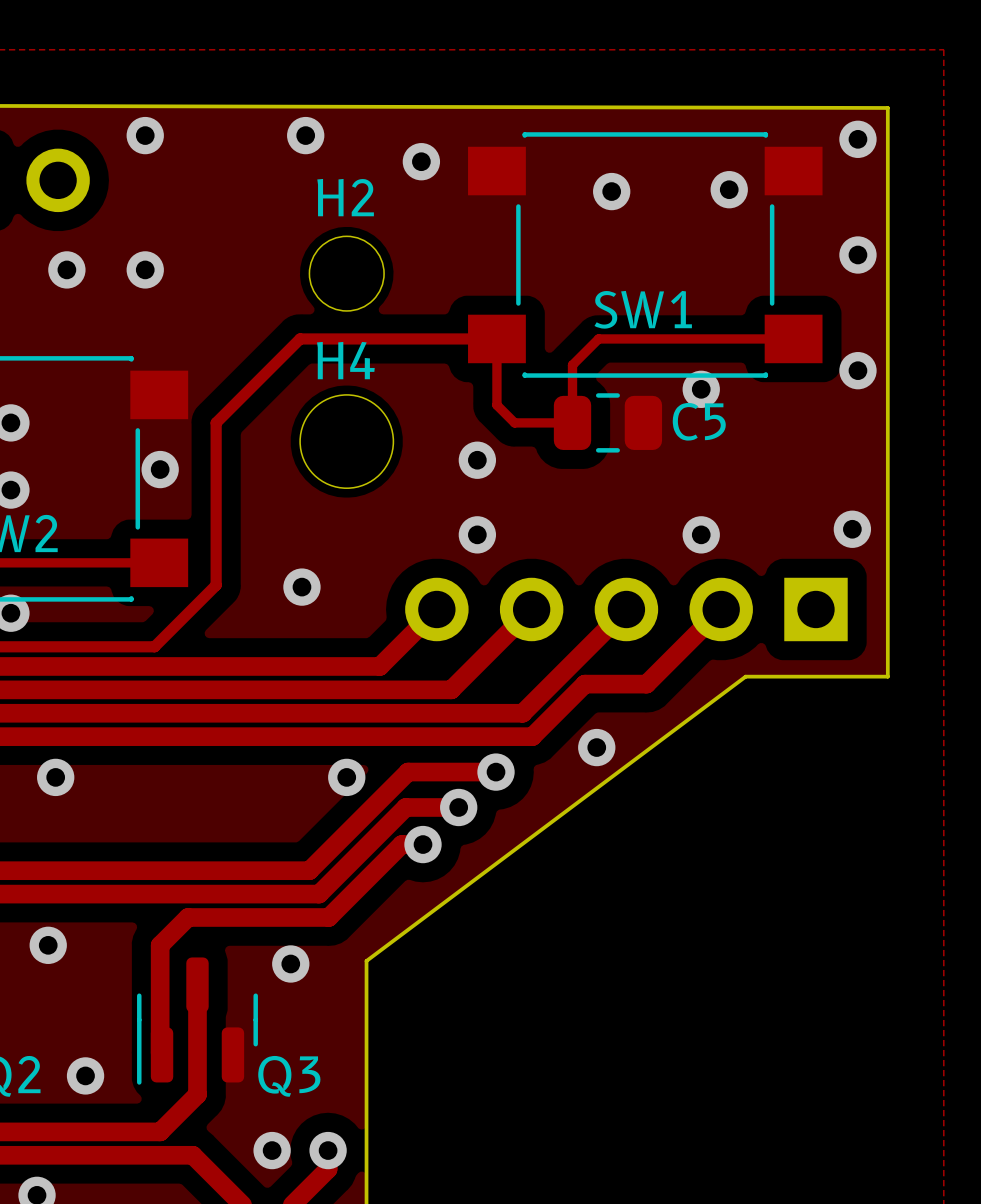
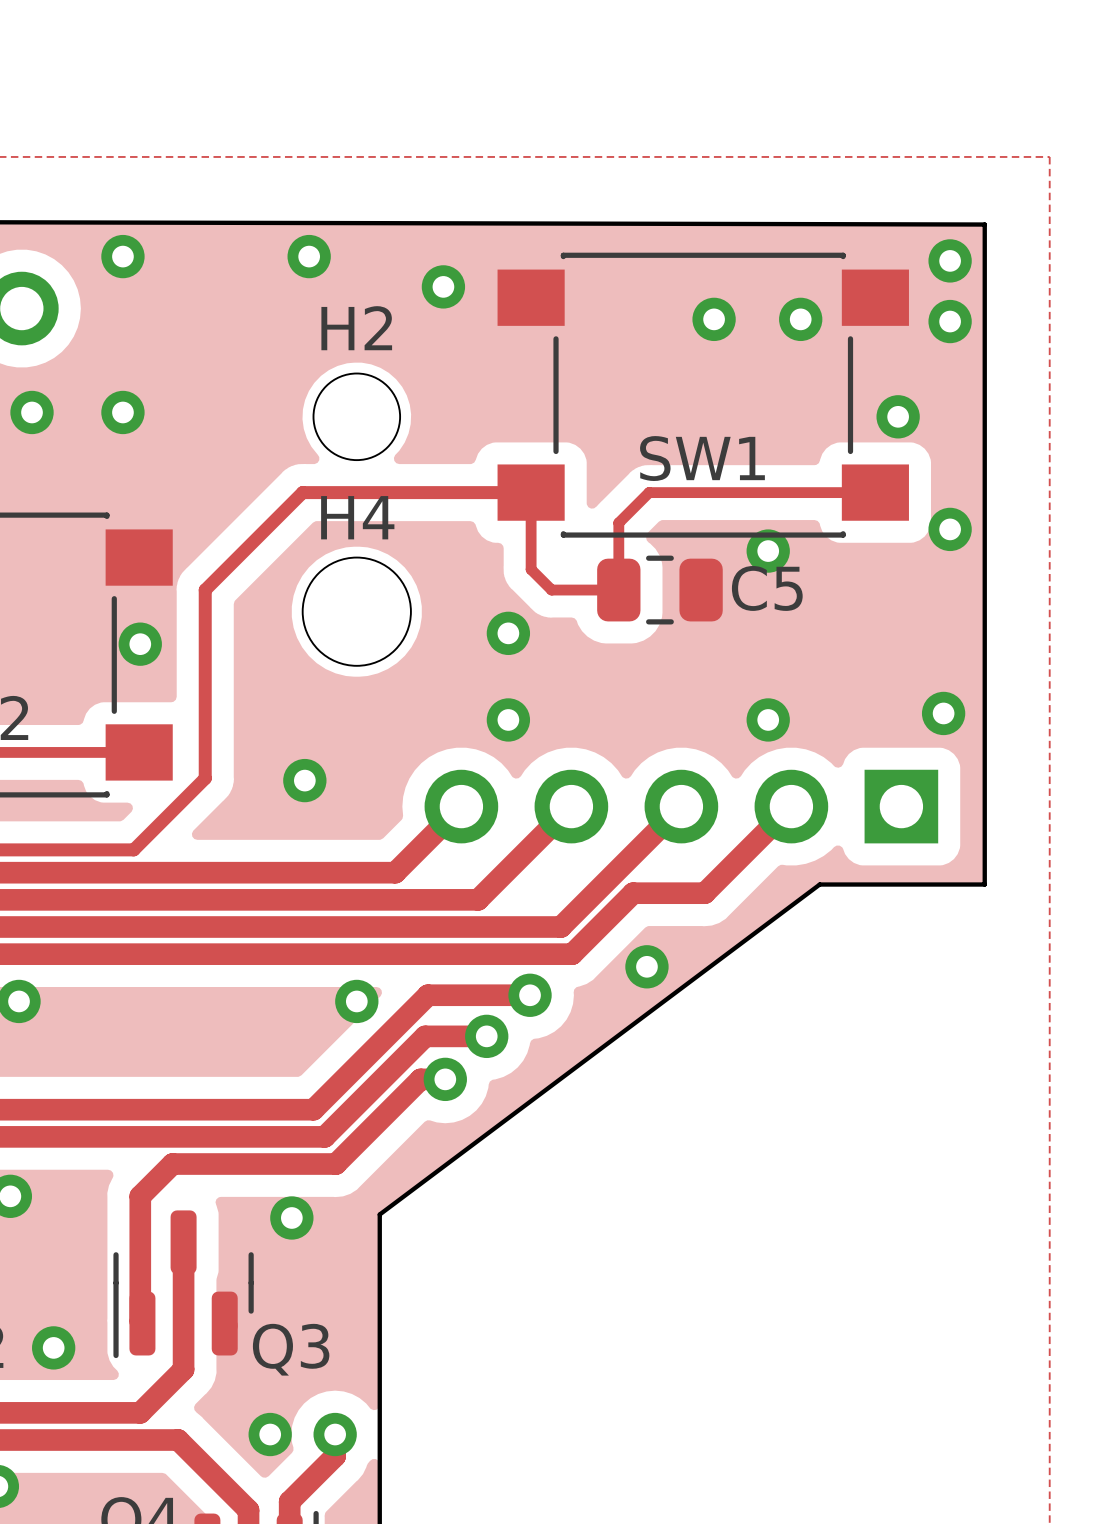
via position: (611, 191) -> (714, 319)
via: none -> (950, 321)
via: (857, 254) -> none
via: none -> (898, 416)

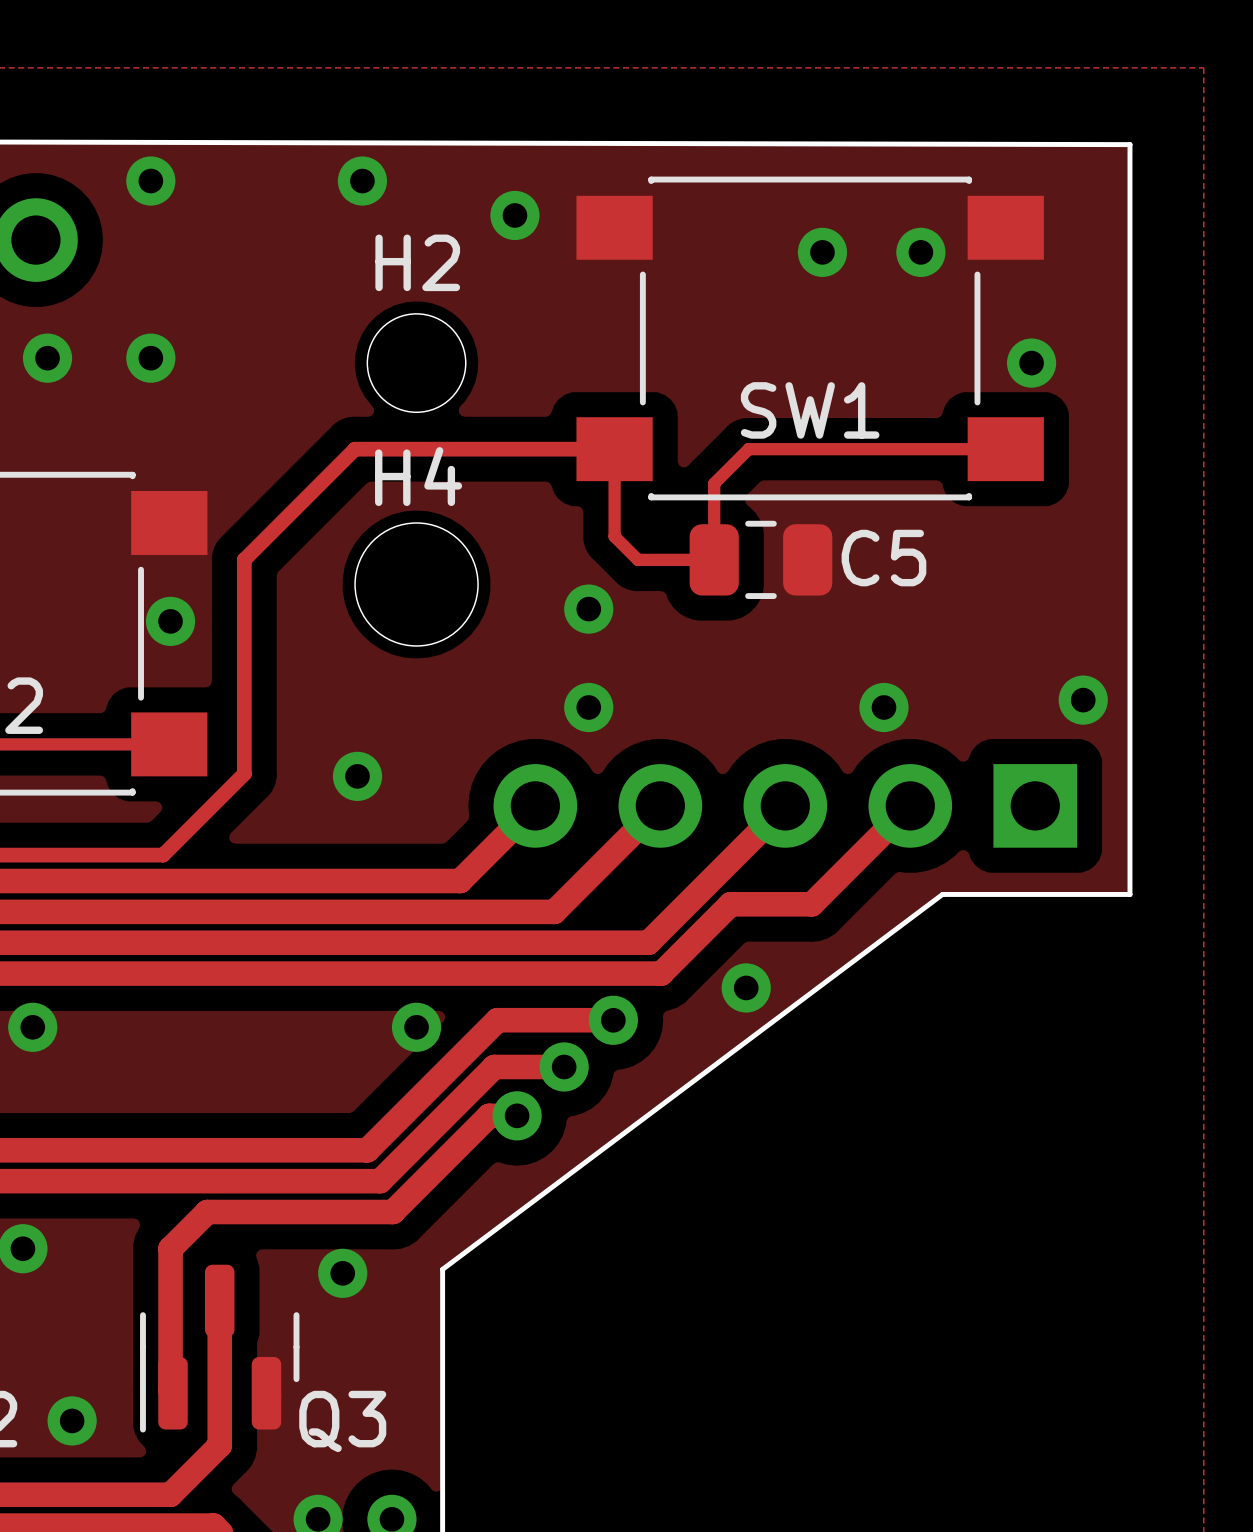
via: (950, 260) -> none
via: (950, 321) -> none
via: (950, 529) -> none
via: (768, 551) -> none

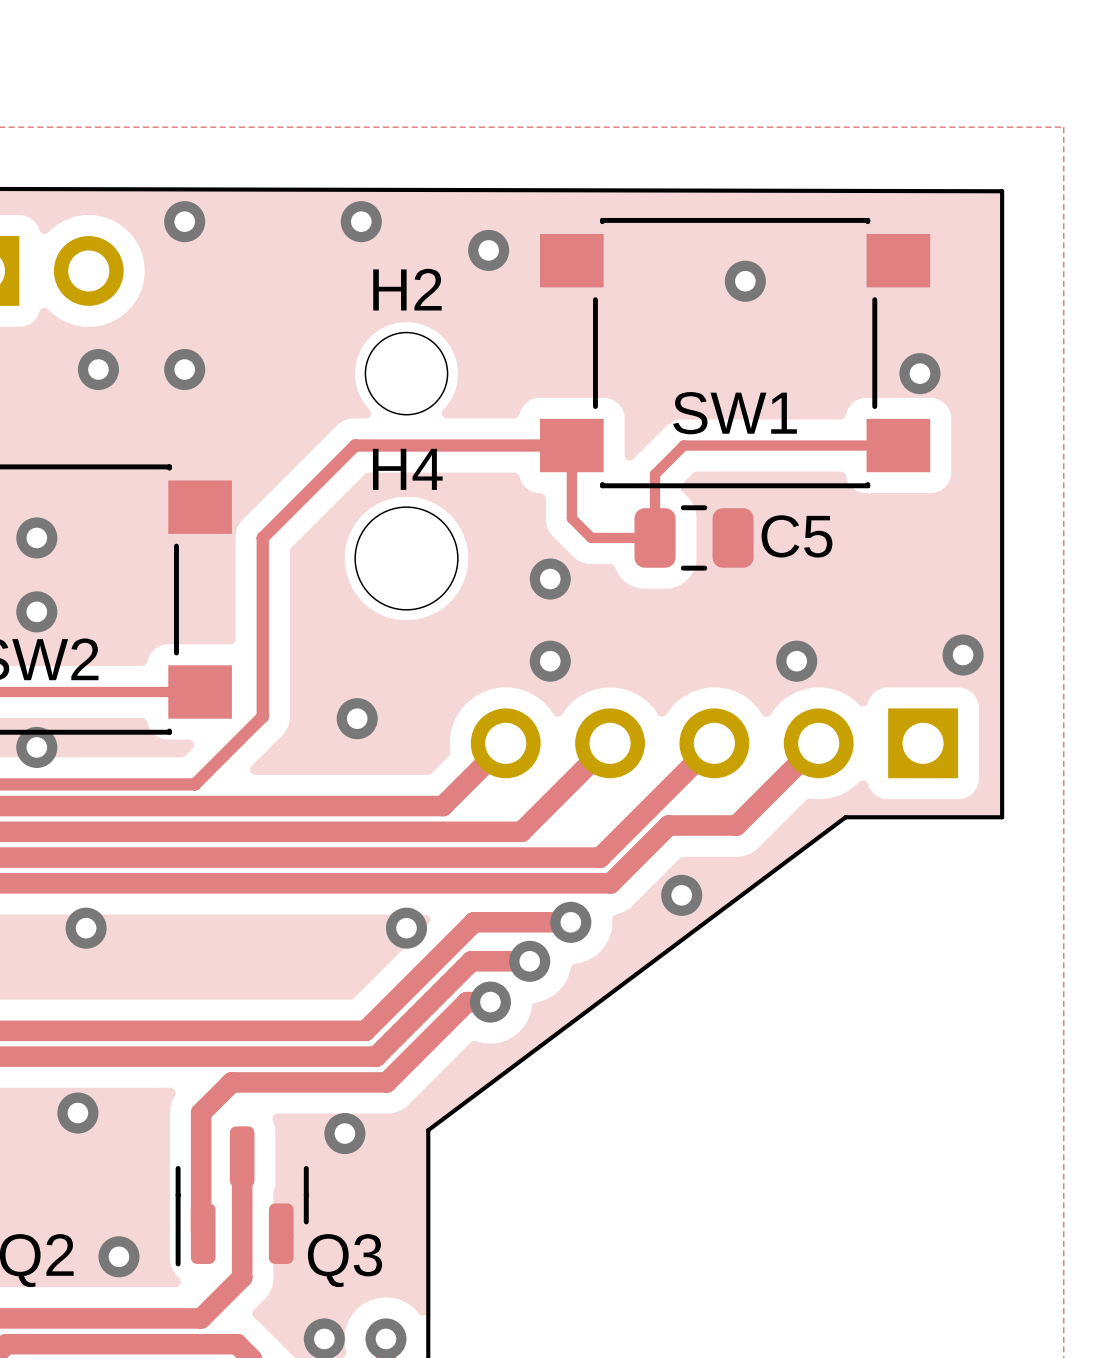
via: (920, 252) -> none
via: (170, 621) -> none

